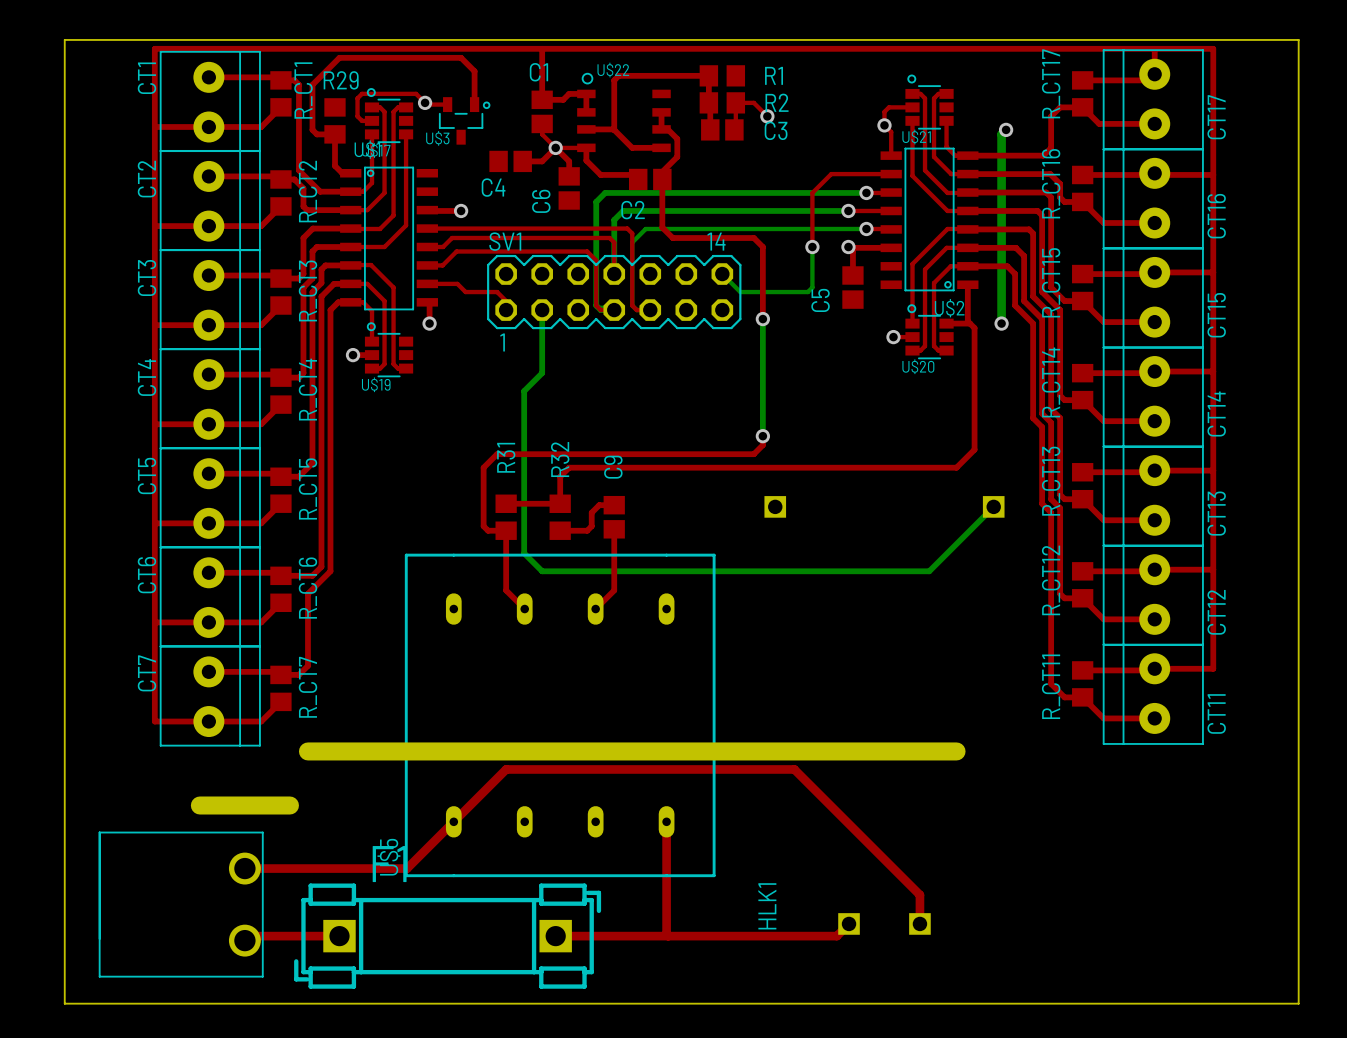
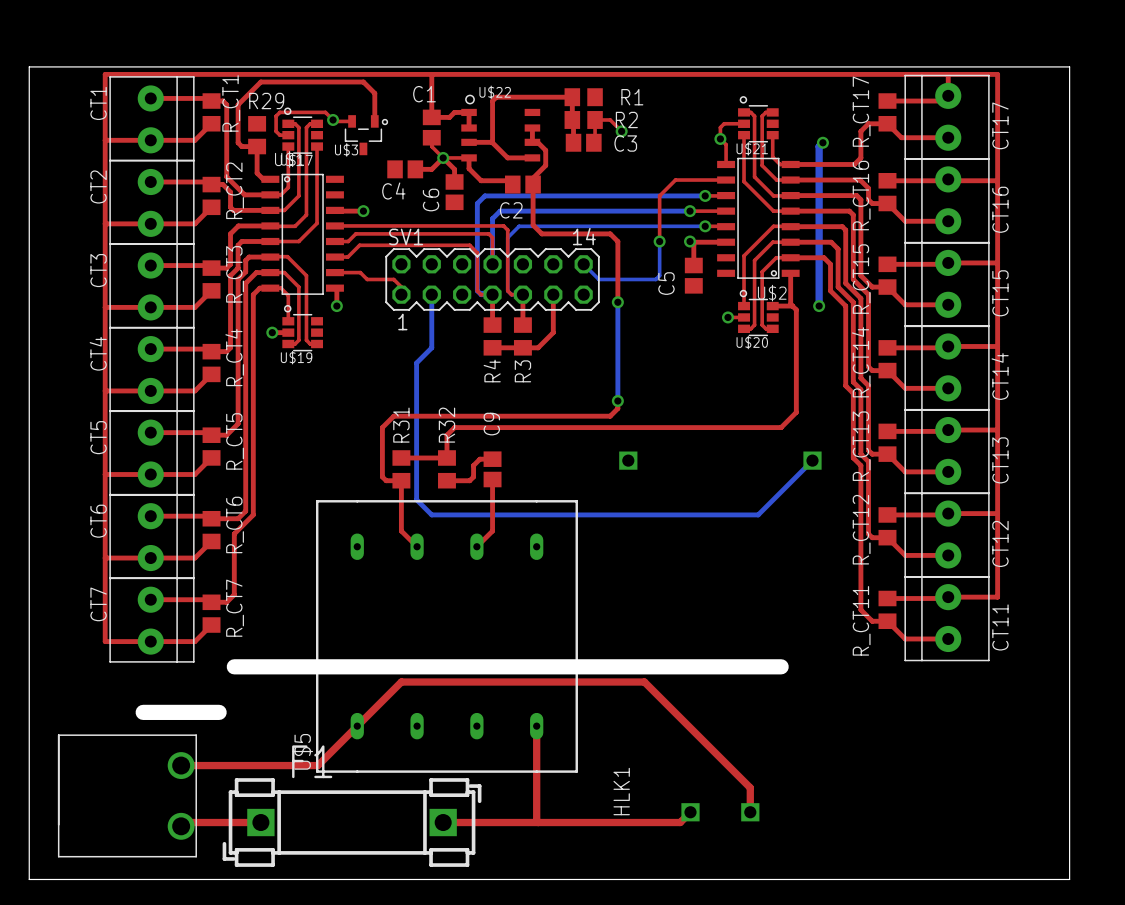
top track: none -> (492, 294) (492, 325)
top track: none -> (522, 294) (522, 325)
top track: none -> (553, 294) (553, 332) (538, 347) (492, 347)
R4: none -> (492, 336)
R3: none -> (522, 336)

